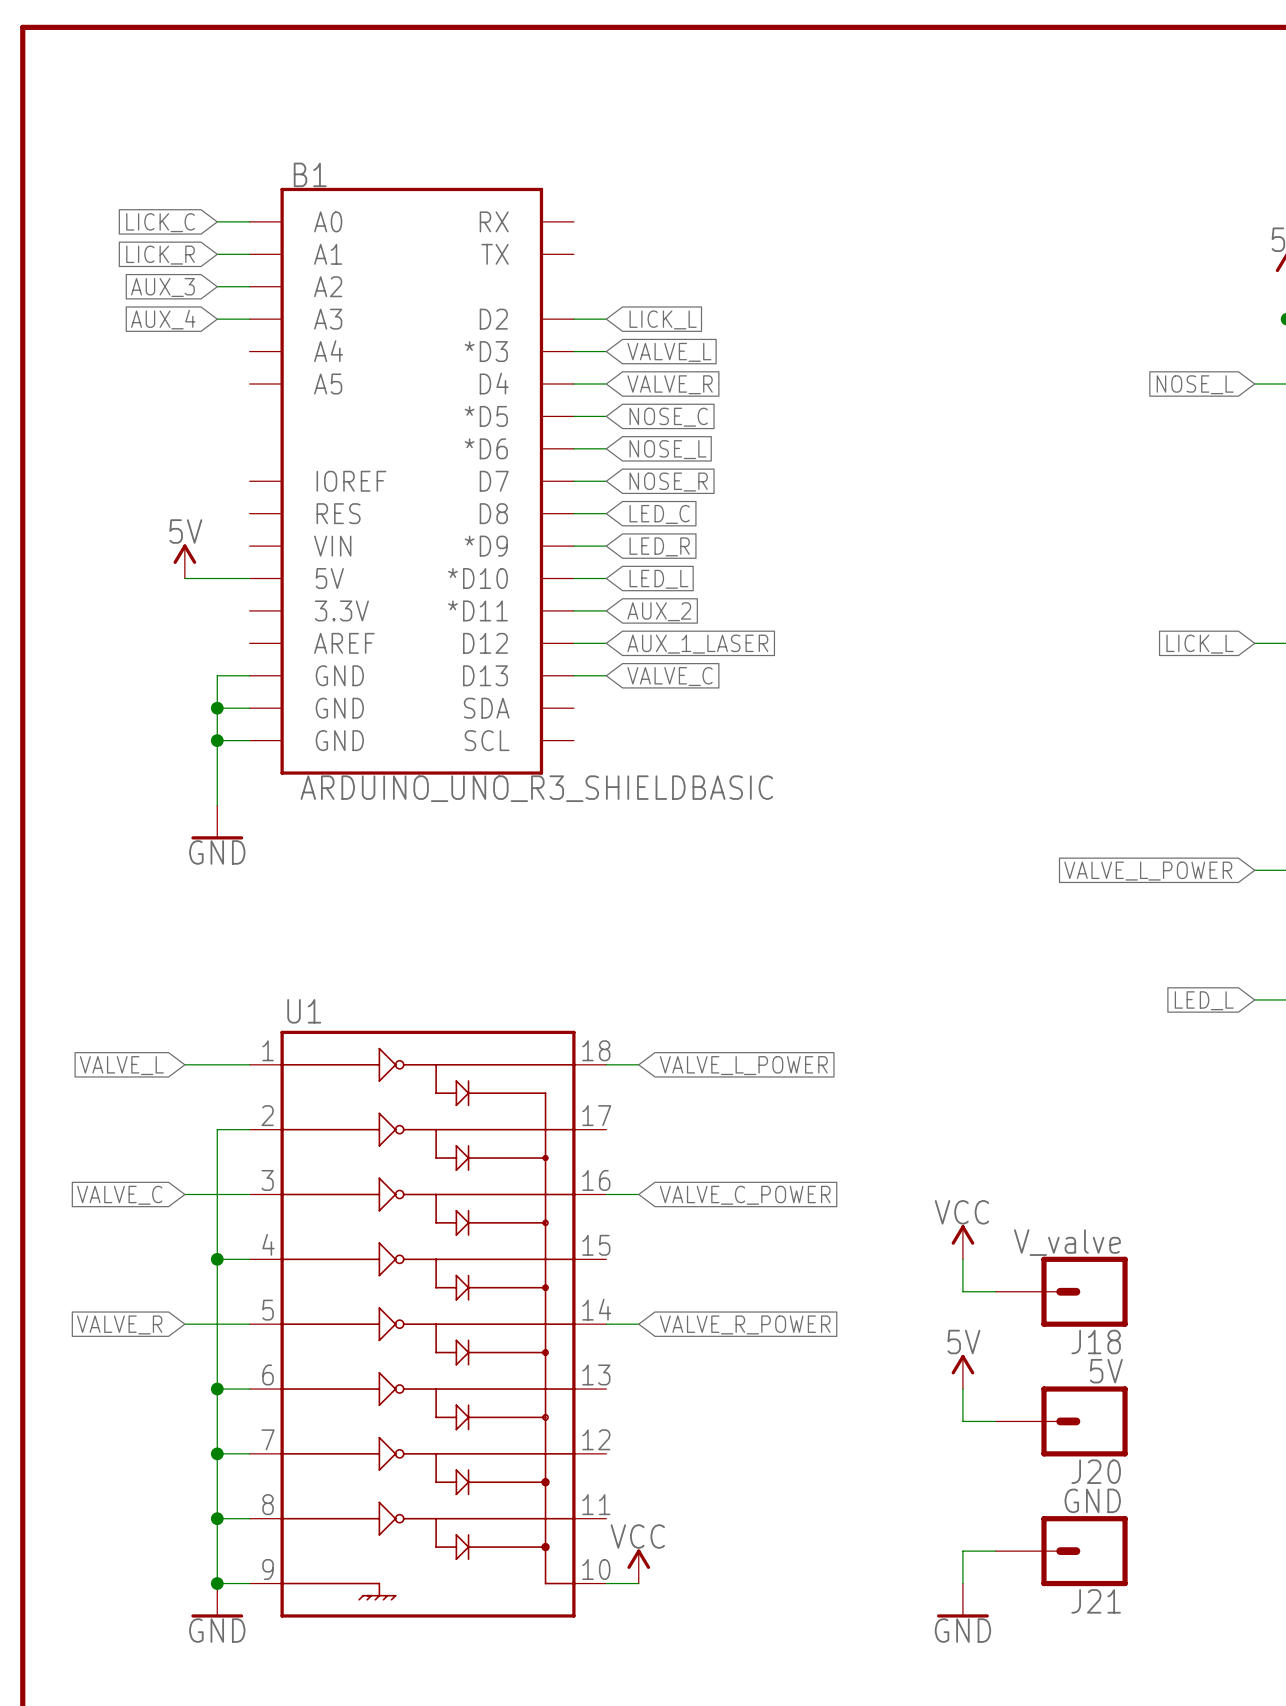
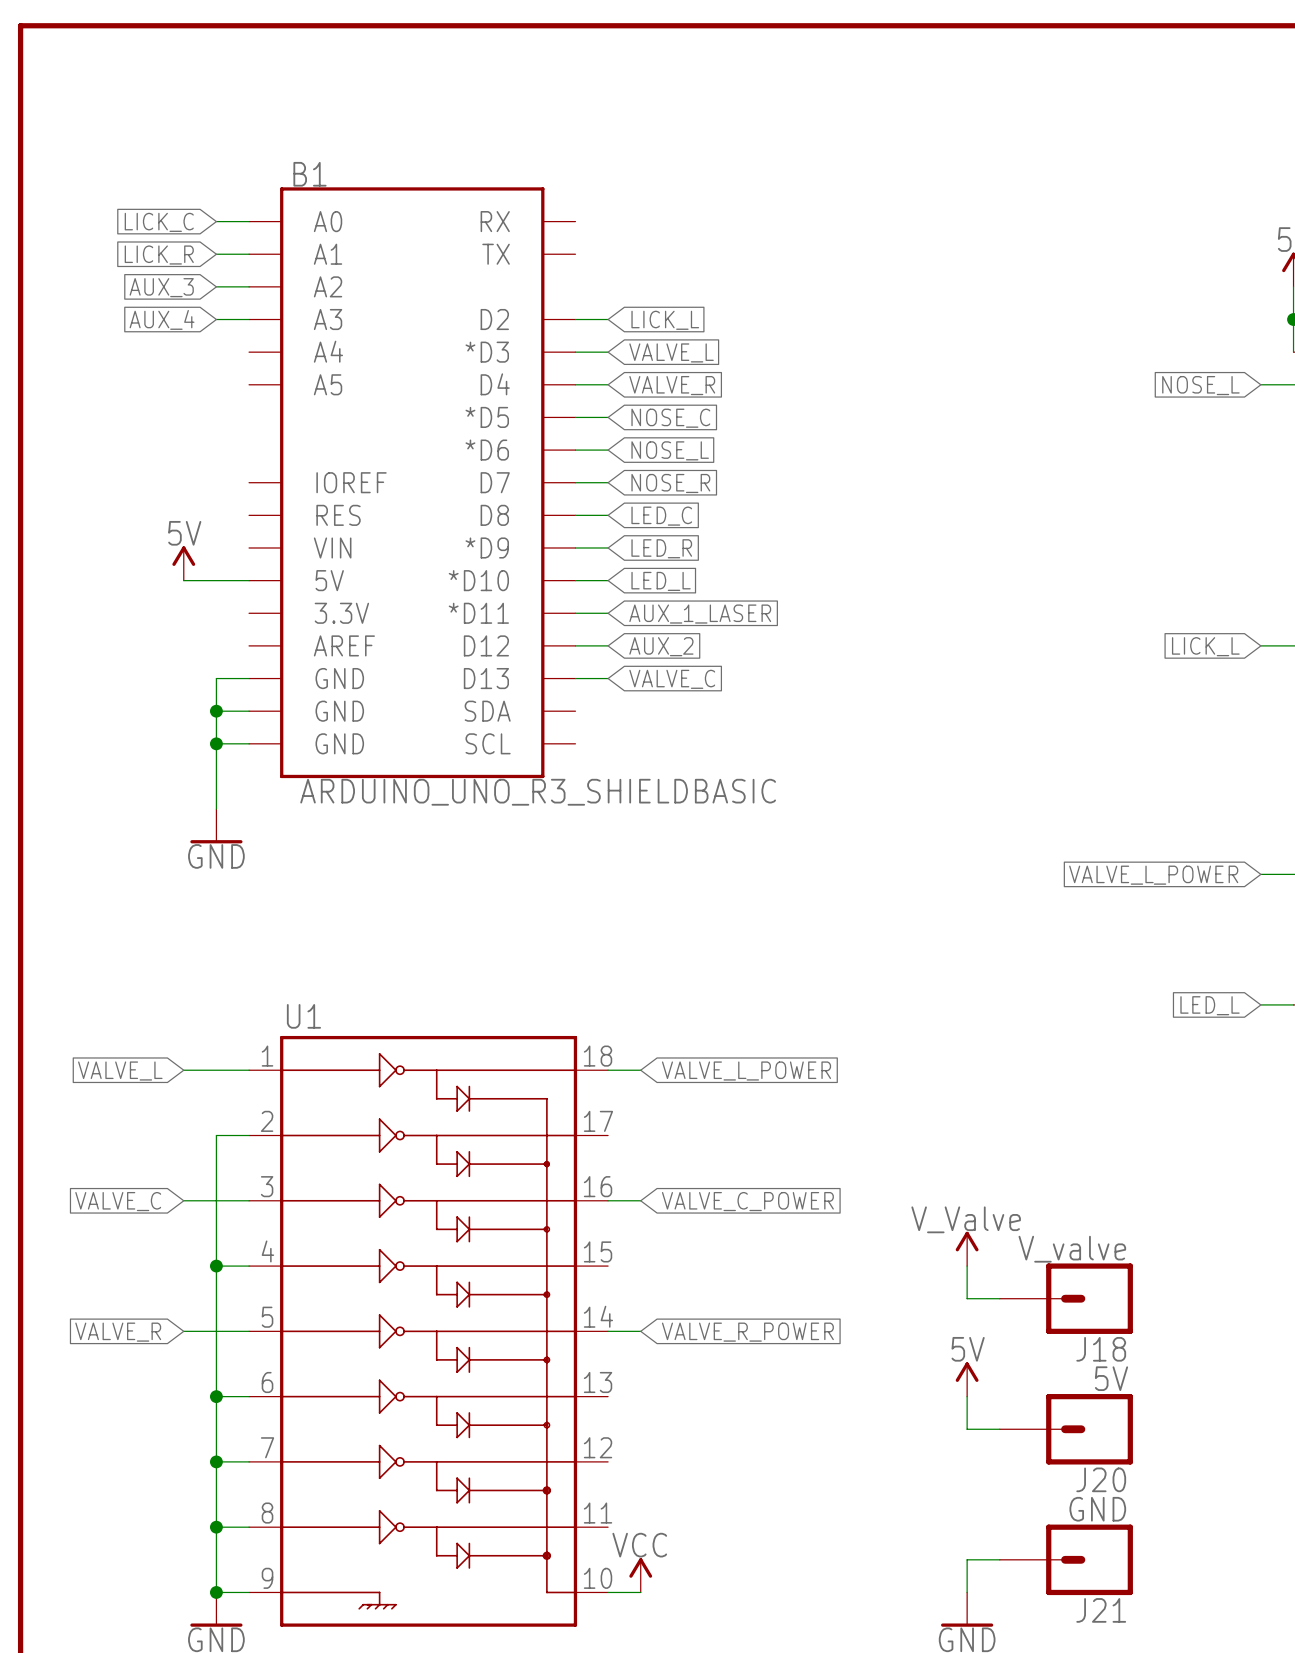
global label: AUX_2 (659, 611) -> AUX_1_LASER (700, 614)
global label: AUX_1_LASER (697, 644) -> AUX_2 (661, 646)
power symbol: VCC (962, 1242) -> V_Valve (967, 1248)

